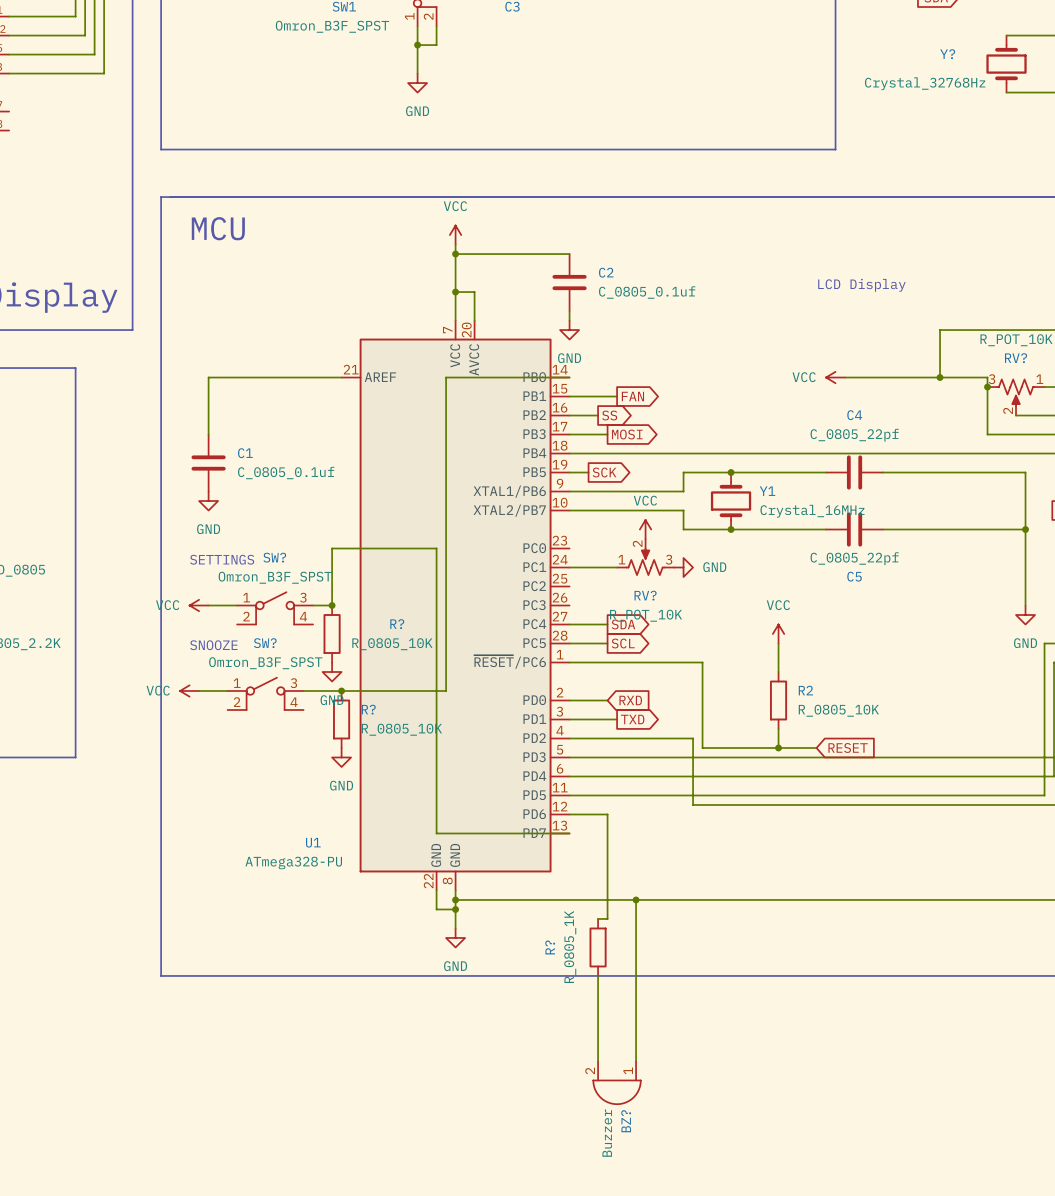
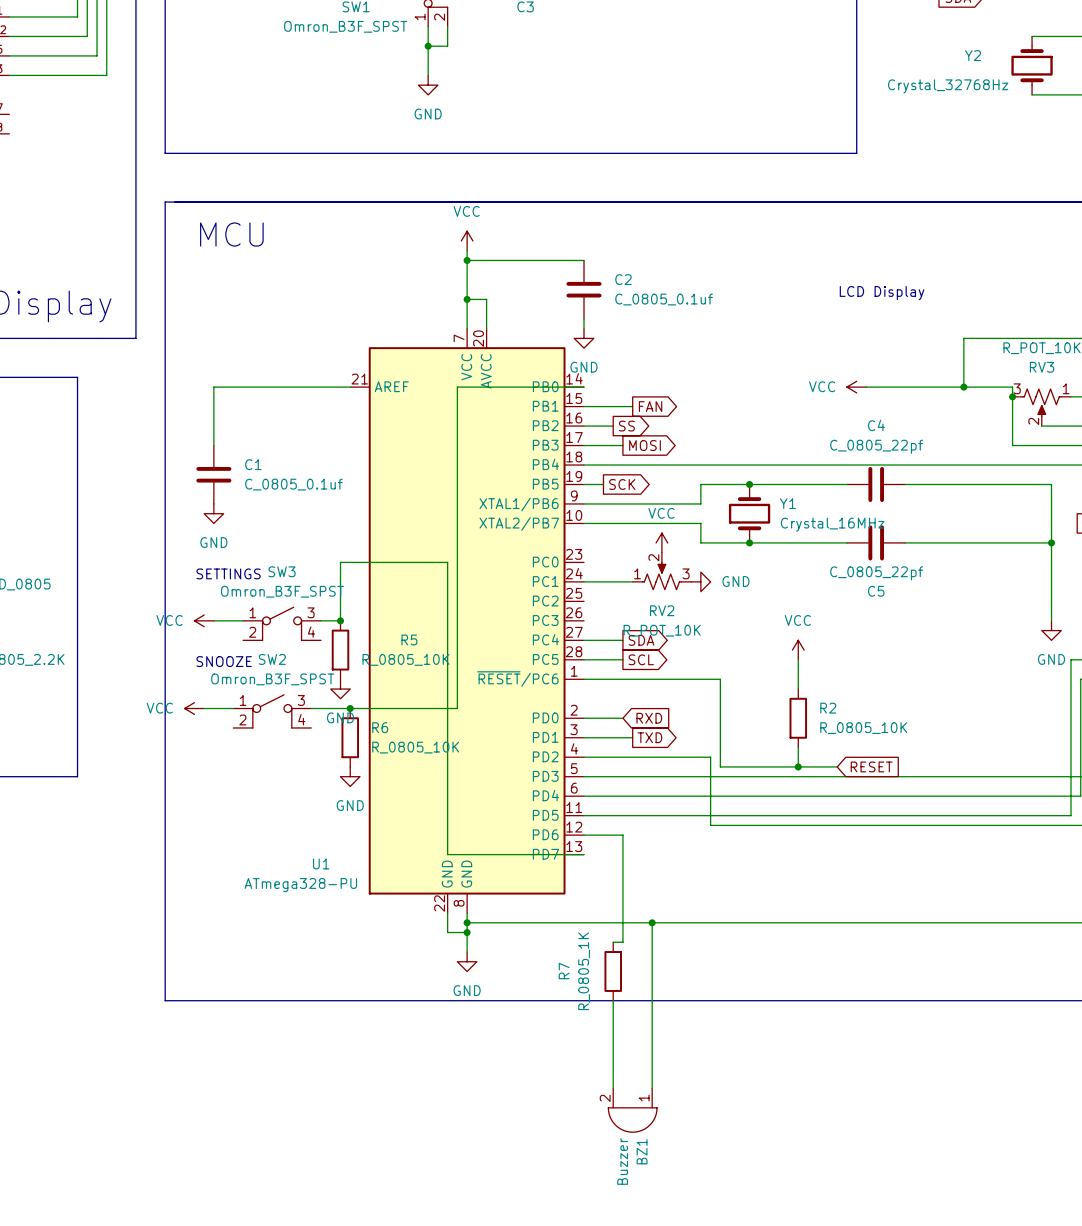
Y? name: Y? (947, 54) -> Y2 (972, 55)
RV? name: RV? (1016, 358) -> RV3 (1042, 367)
SW? name: SW? (274, 557) -> SW3 (282, 571)
RV? name: RV? (645, 595) -> RV2 (662, 610)
R? name: R? (397, 624) -> R5 (409, 639)
SW? name: SW? (265, 643) -> SW2 (272, 659)
R? name: R? (368, 709) -> R6 (380, 727)
R? name: R? (550, 947) -> R7 (564, 971)
BZ? name: BZ? (626, 1121) -> BZ1 (642, 1151)

